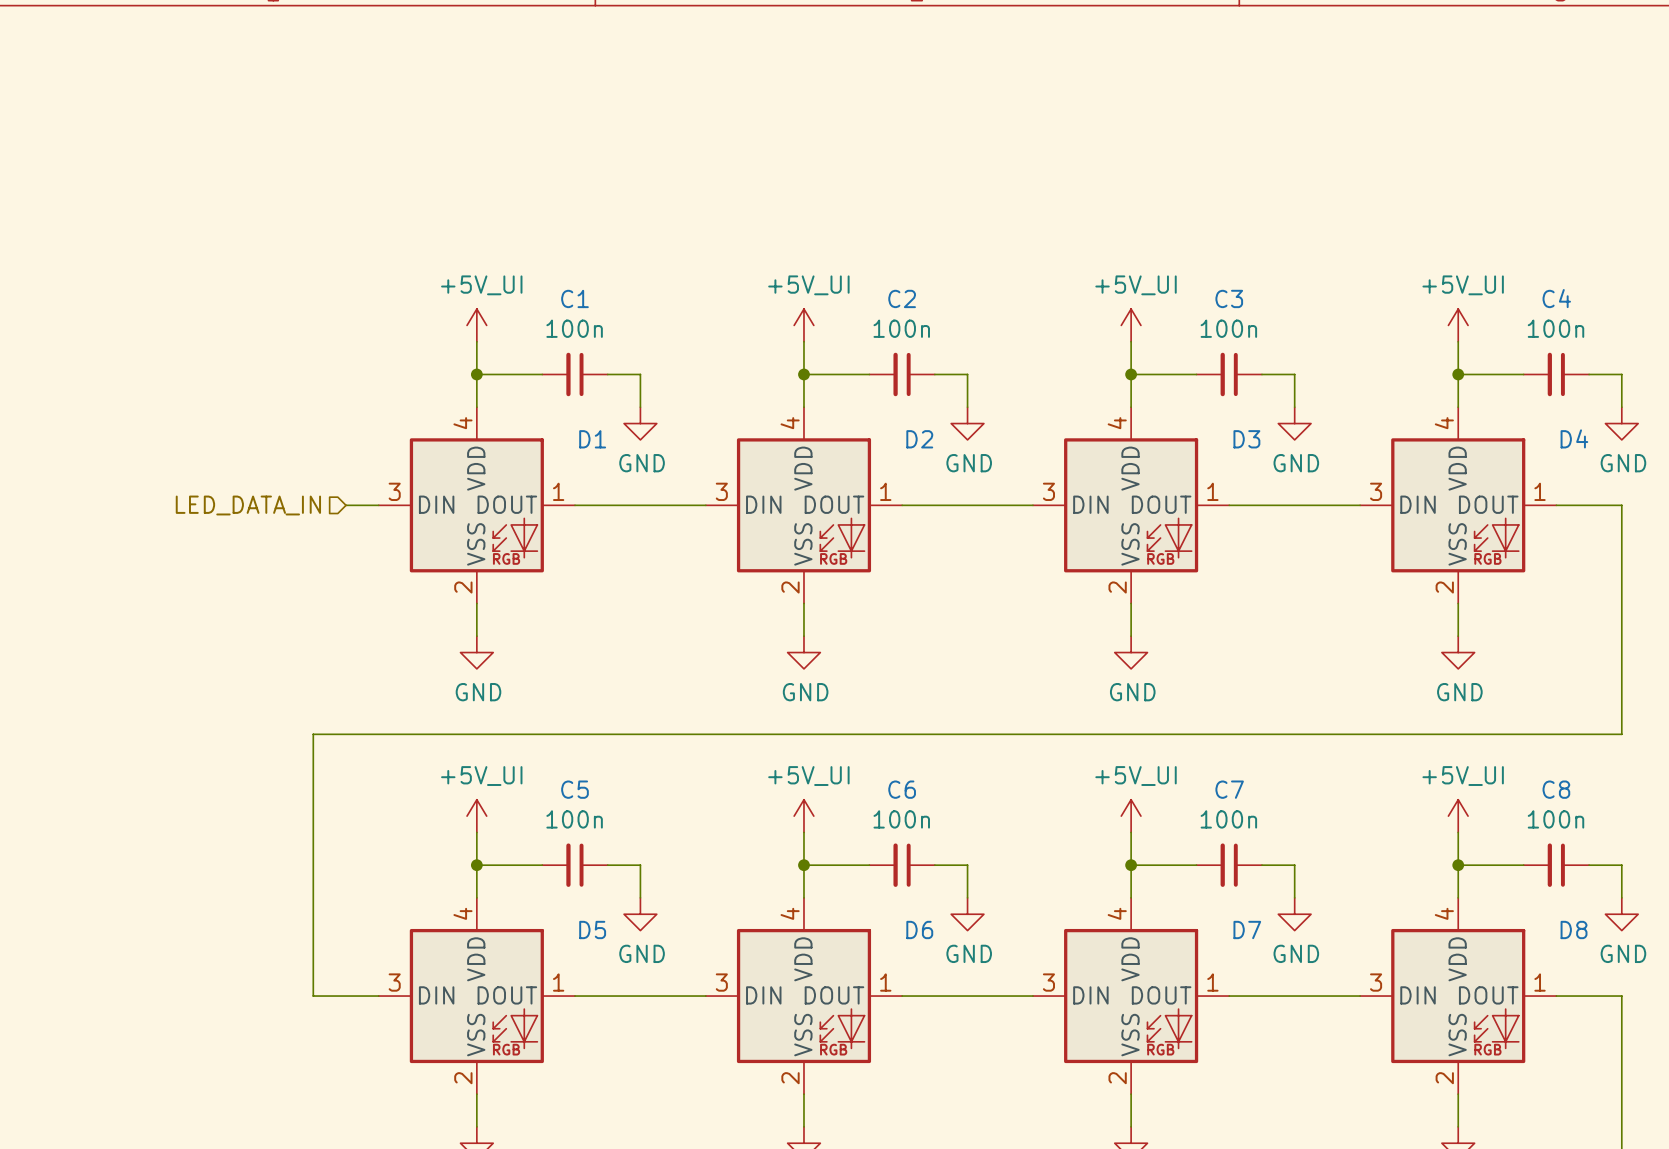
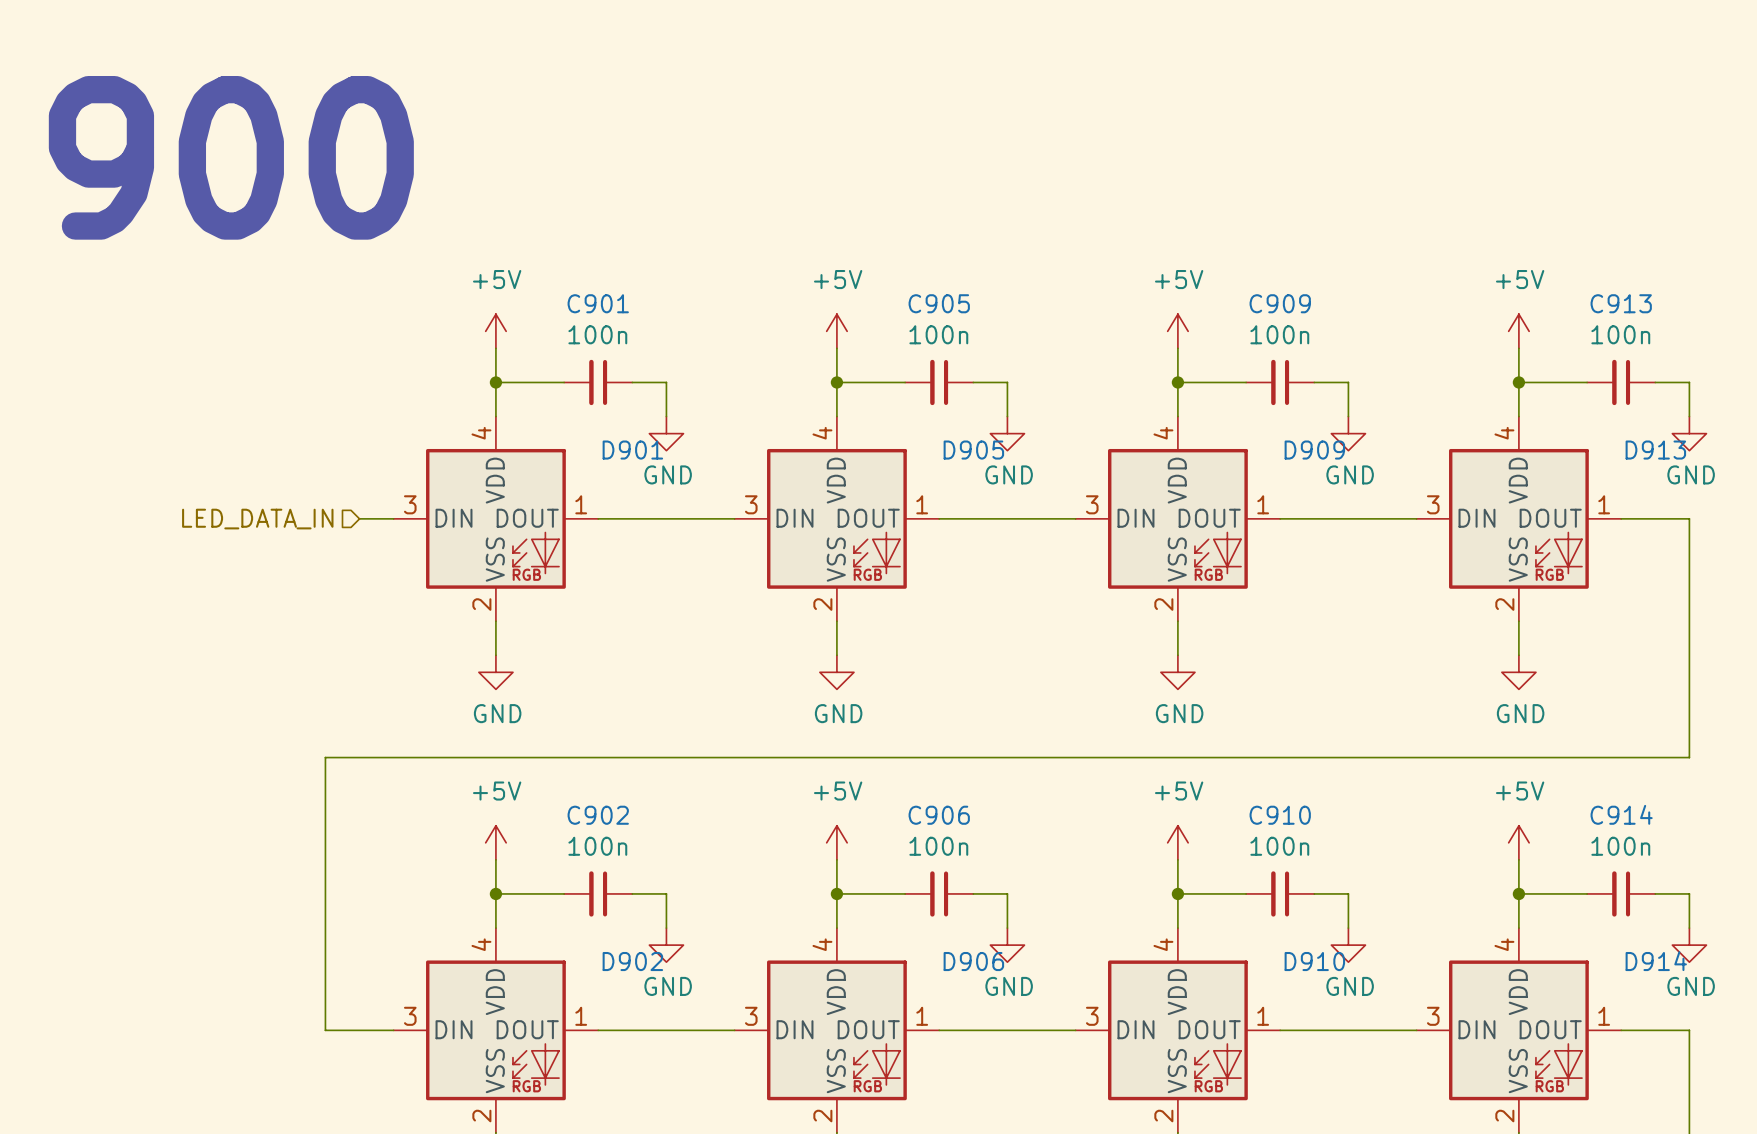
text: none -> 900 (231, 157)
C1 name: C1 (574, 298) -> C901 (598, 303)
C2 name: C2 (902, 298) -> C905 (939, 303)
C3 name: C3 (1229, 298) -> C909 (1280, 303)
C4 name: C4 (1556, 298) -> C913 (1621, 303)
power symbol: +5V_UI (476, 325) -> +5V (495, 331)
power symbol: +5V_UI (803, 325) -> +5V (836, 331)
power symbol: +5V_UI (1131, 325) -> +5V (1177, 331)
power symbol: +5V_UI (1458, 325) -> +5V (1518, 331)
D4 name: D4 (1574, 438) -> D913 (1655, 450)
D1 name: D1 (592, 439) -> D901 (632, 450)
D2 name: D2 (919, 439) -> D905 (973, 450)
D3 name: D3 (1246, 439) -> D909 (1314, 450)
C5 name: C5 (574, 789) -> C902 (598, 815)
C6 name: C6 (902, 789) -> C906 (939, 815)
C7 name: C7 (1229, 789) -> C910 (1280, 815)
C8 name: C8 (1556, 789) -> C914 (1621, 814)
power symbol: +5V_UI (476, 816) -> +5V (495, 842)
power symbol: +5V_UI (803, 816) -> +5V (836, 842)
power symbol: +5V_UI (1131, 816) -> +5V (1177, 842)
power symbol: +5V_UI (1458, 816) -> +5V (1518, 842)
D5 name: D5 (592, 929) -> D902 (632, 961)
D6 name: D6 (919, 929) -> D906 (973, 961)
D7 name: D7 (1247, 929) -> D910 (1314, 961)
D8 name: D8 (1574, 929) -> D914 (1656, 961)

